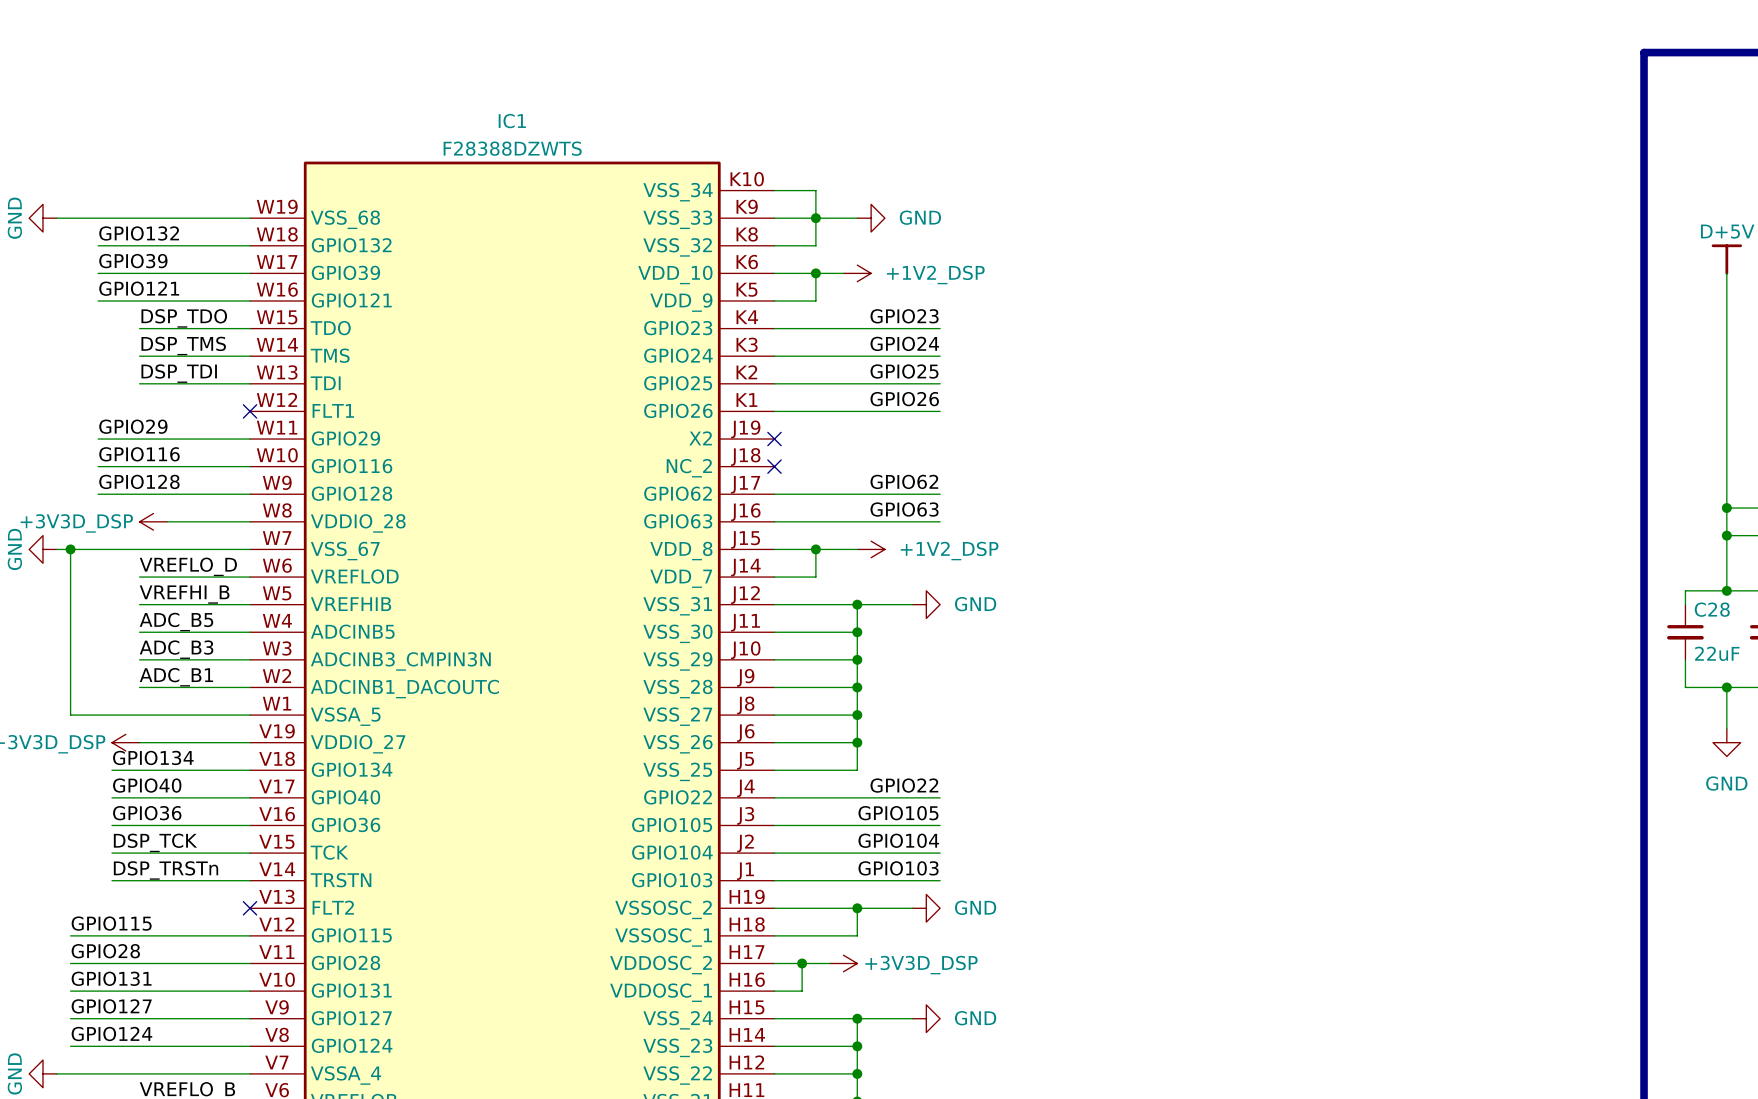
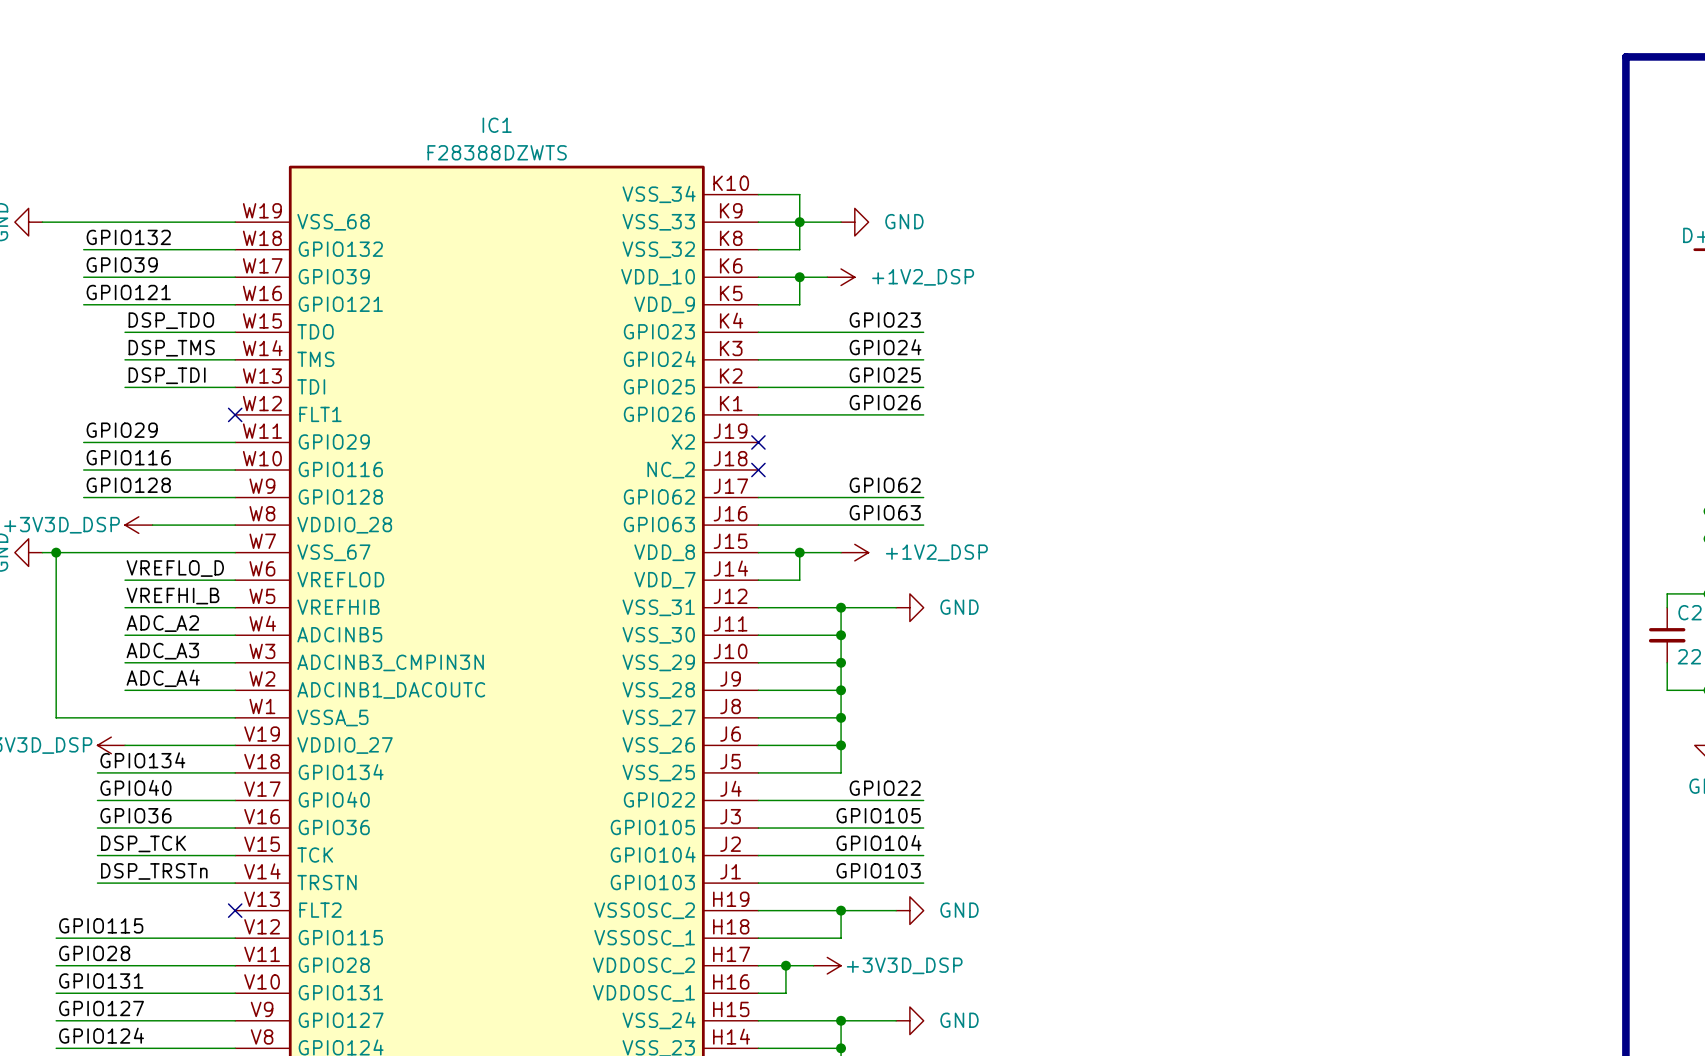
label: ADC_B5 (176, 622) -> ADC_A2 (162, 623)
label: ADC_B3 (176, 649) -> ADC_A3 (162, 651)
label: ADC_B1 (176, 677) -> ADC_A4 (163, 678)

